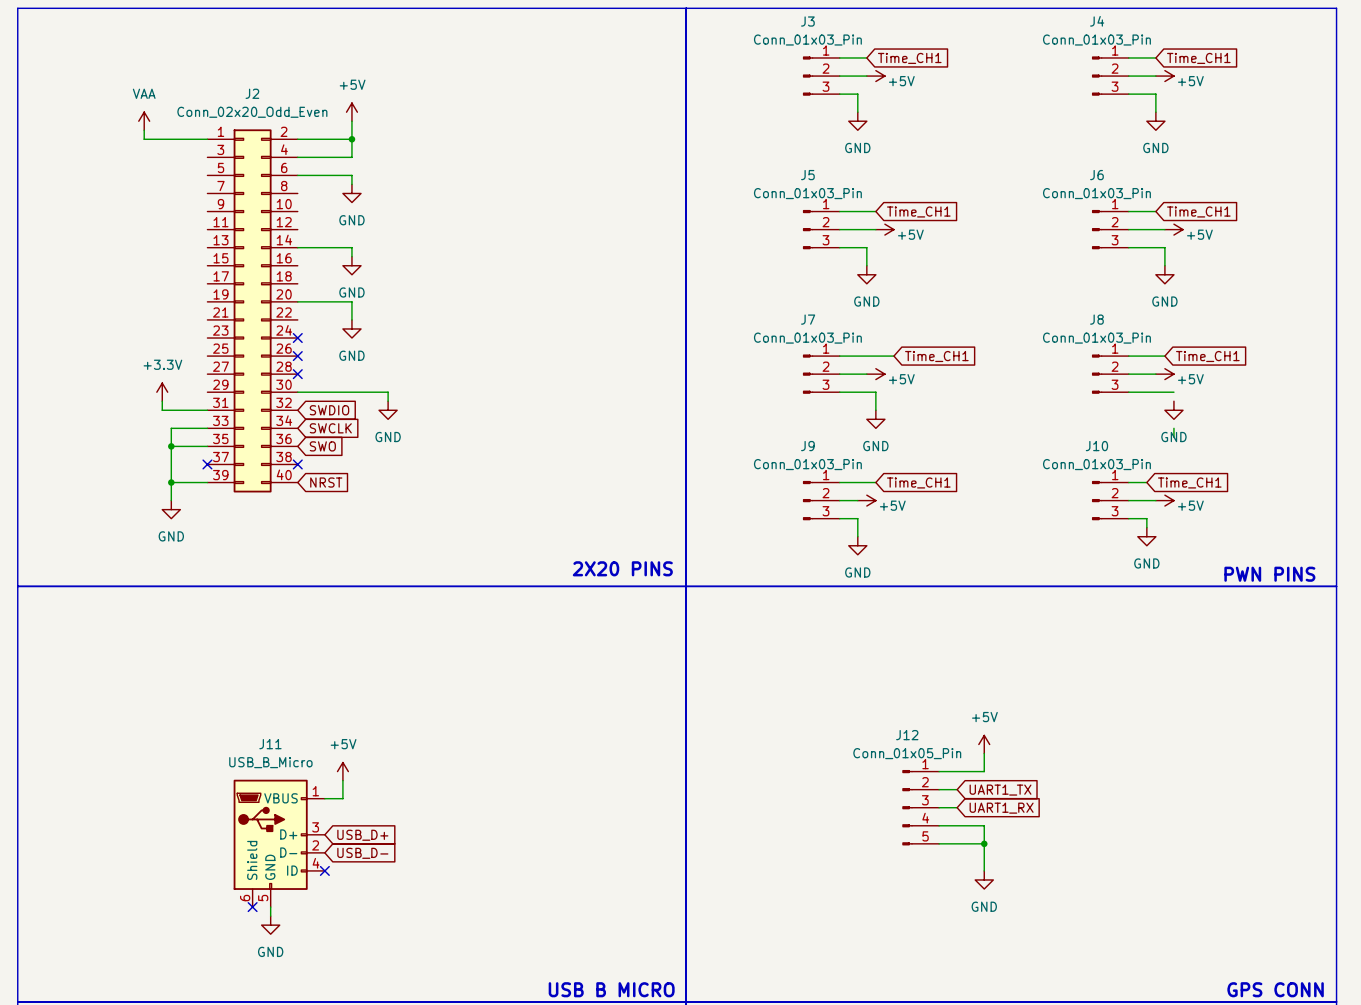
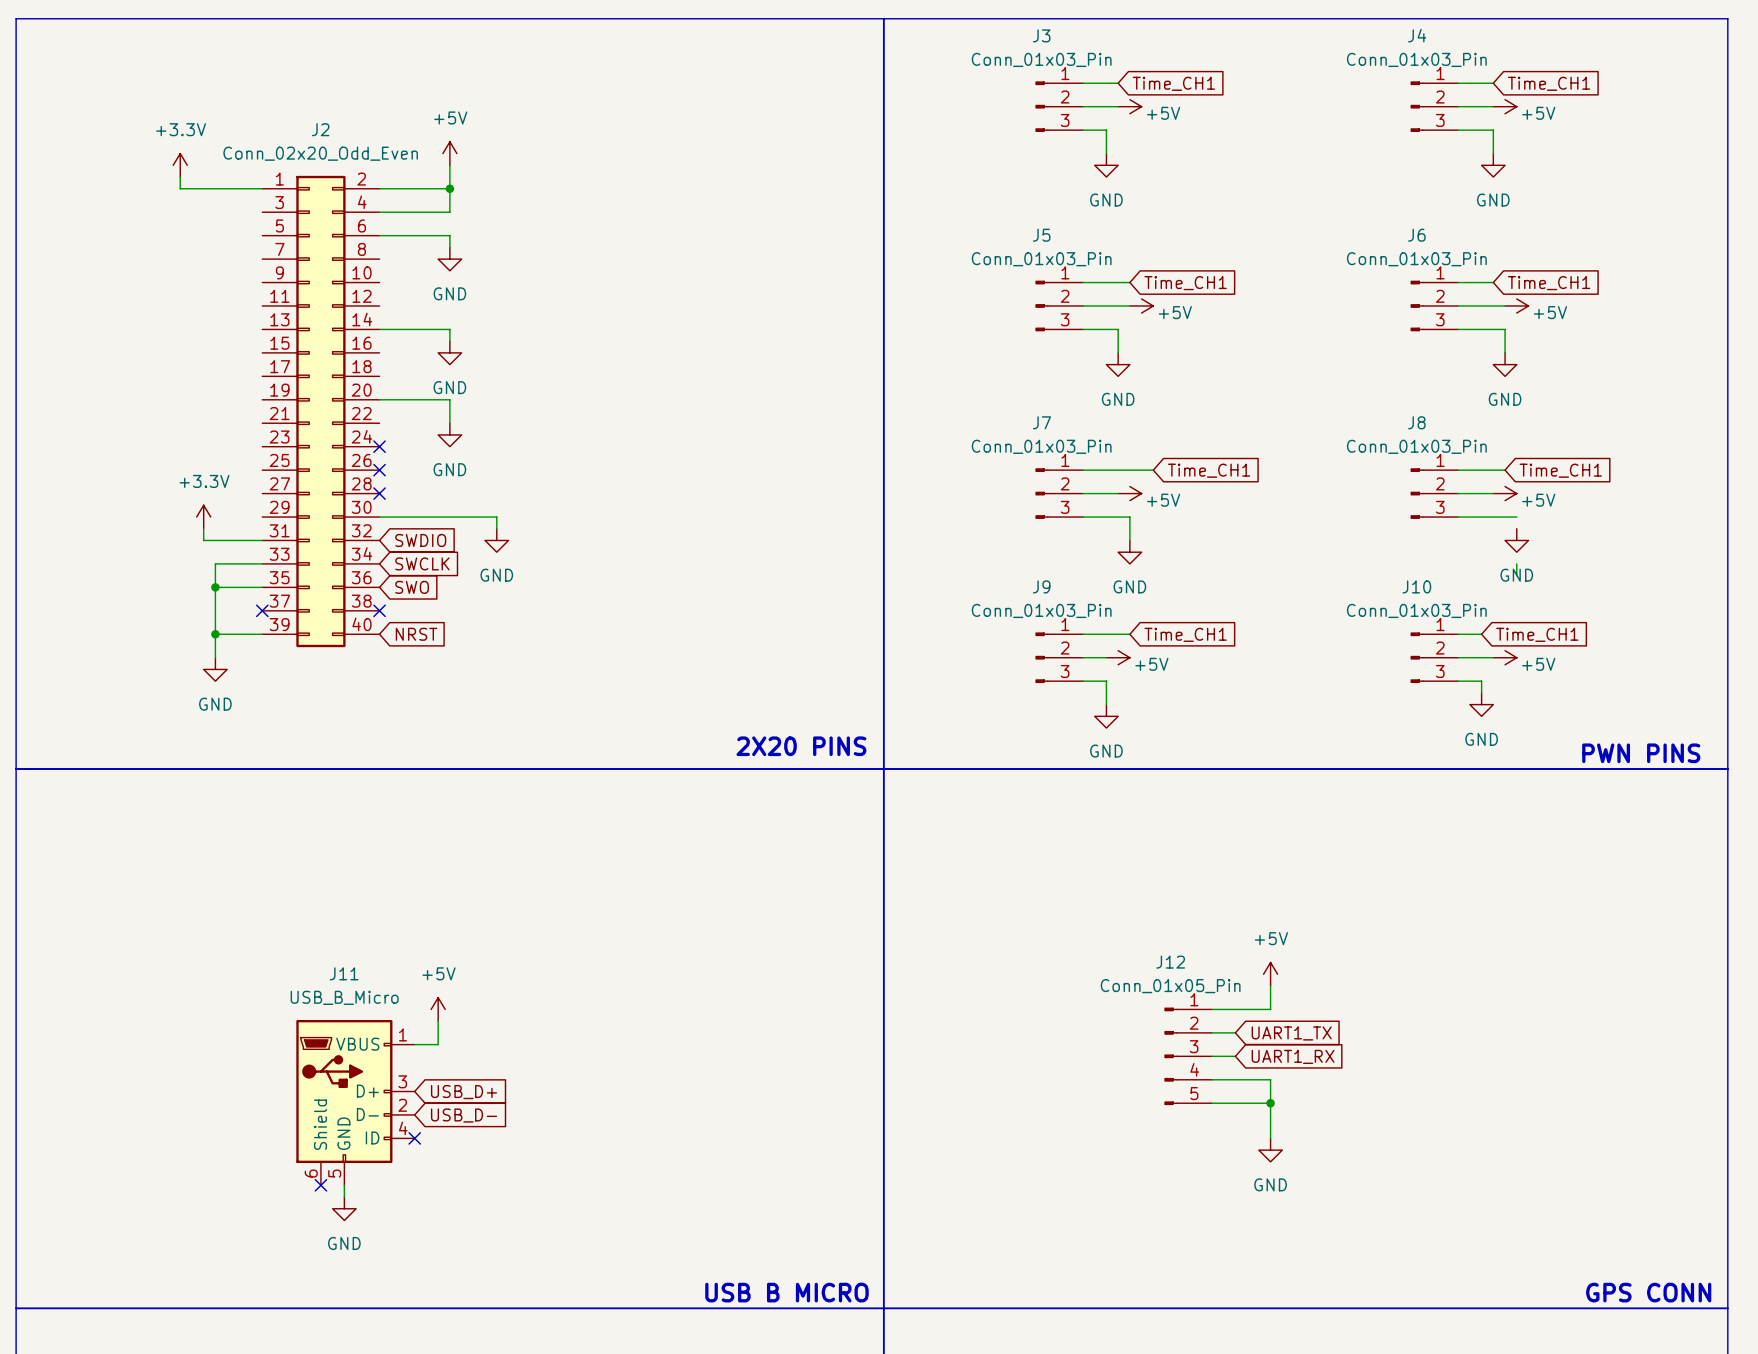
power symbol: VAA (144, 121) -> +3.3V (180, 165)

